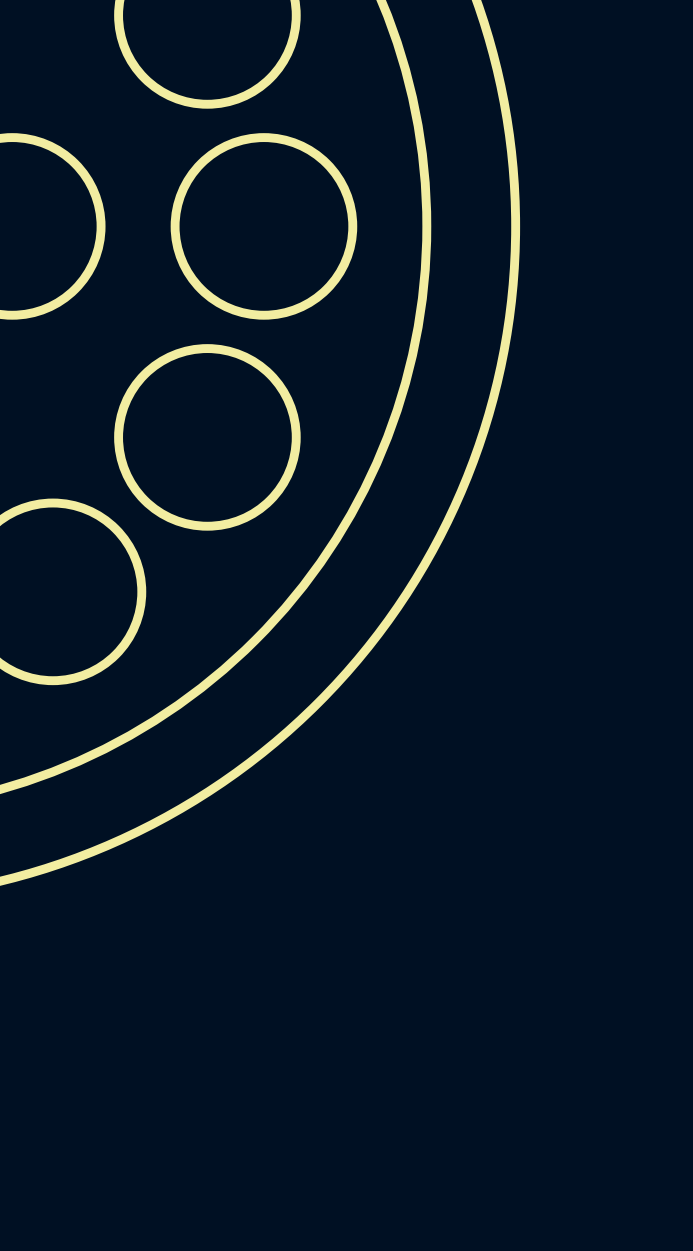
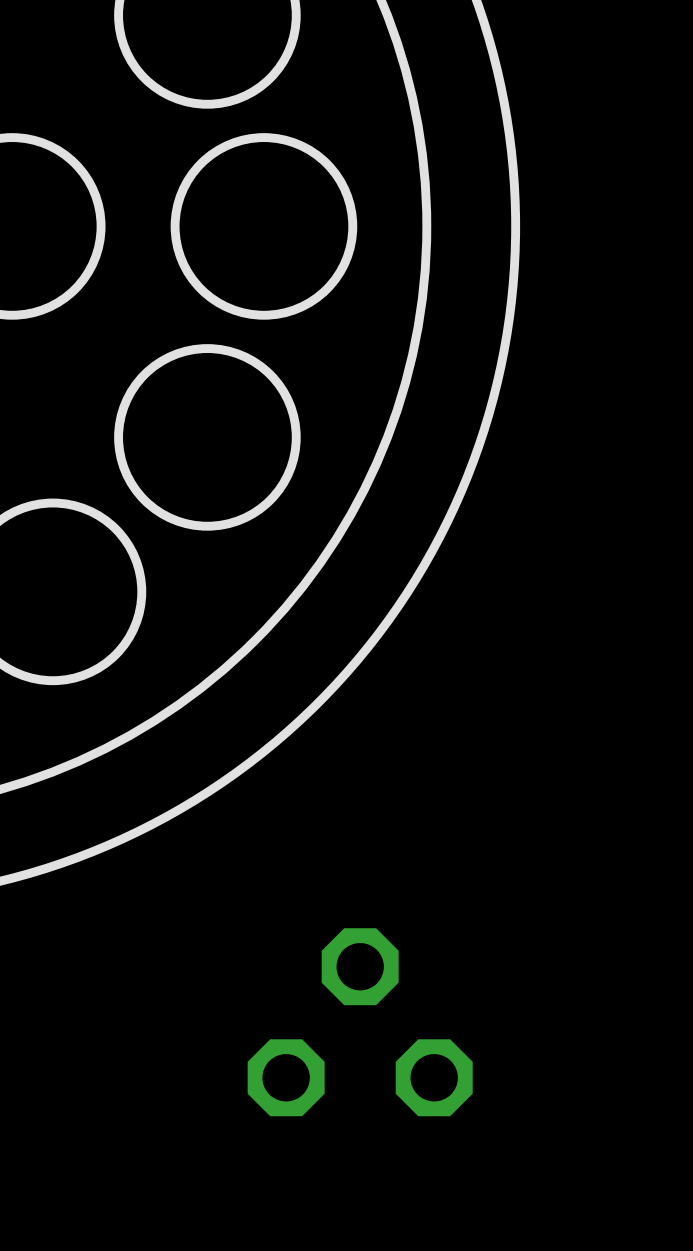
part: none -> (360, 1022)

